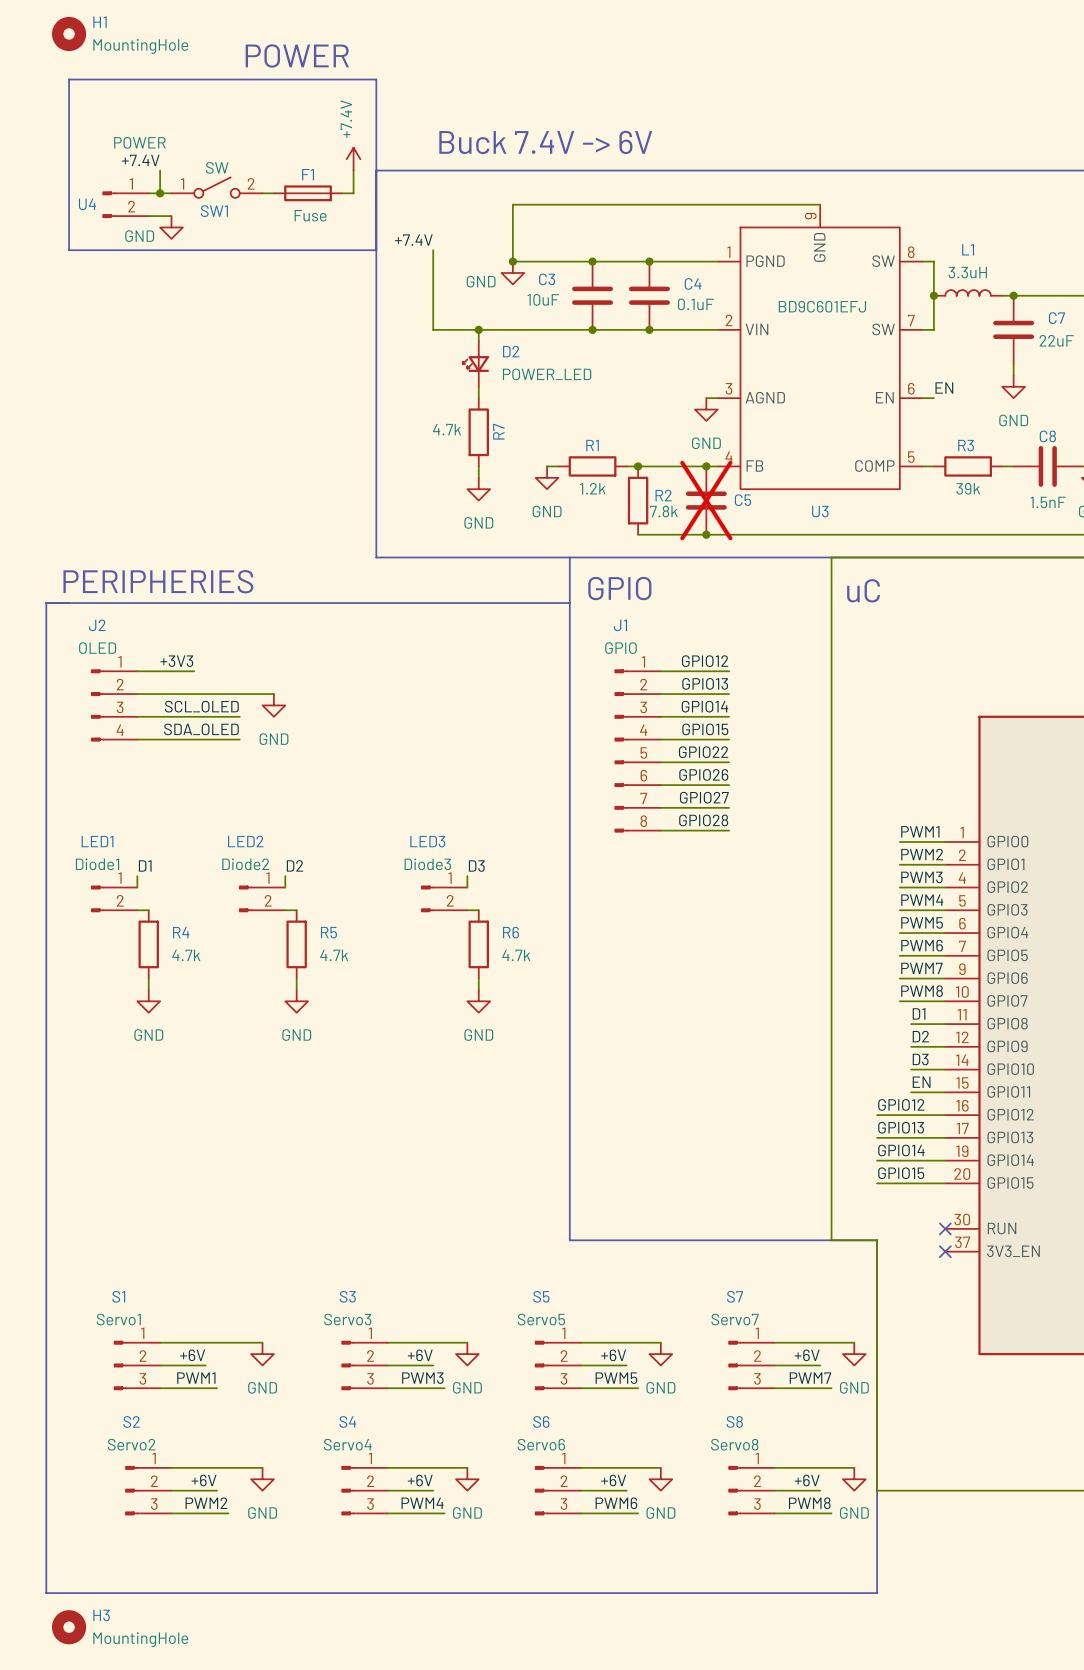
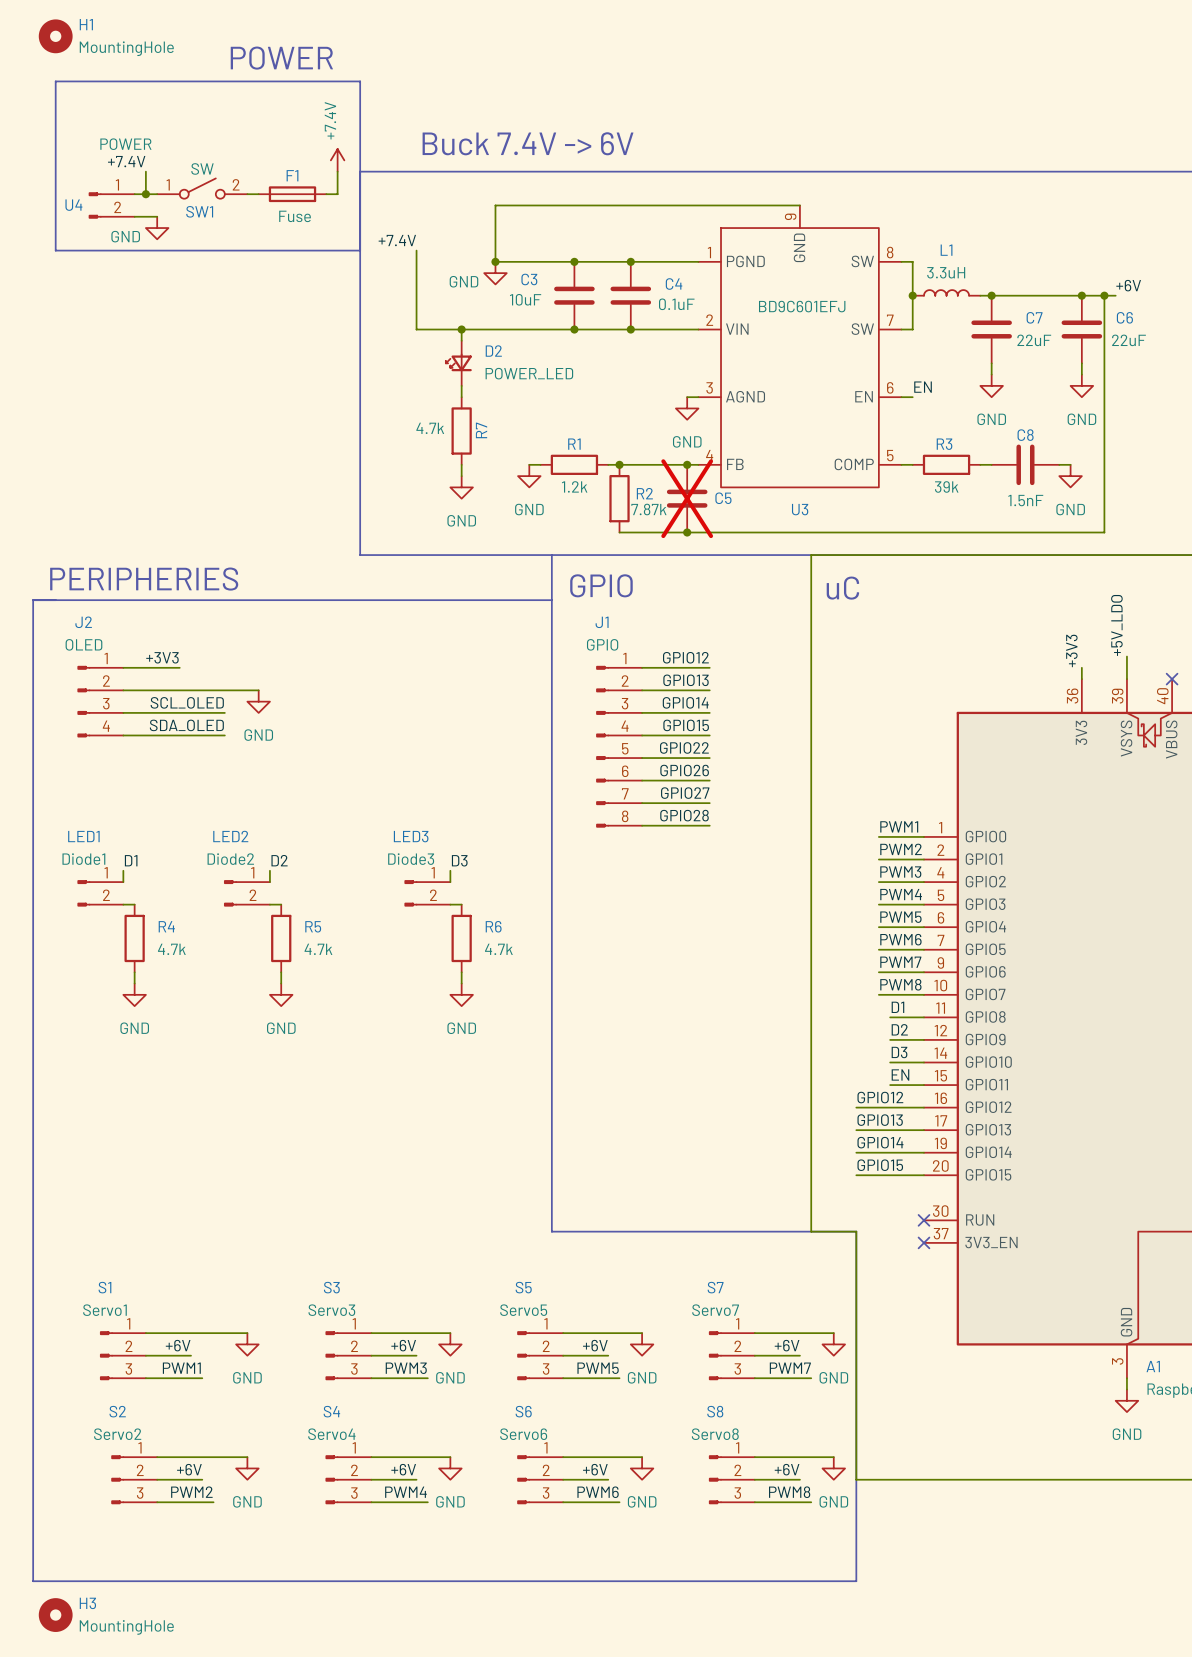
R2 value: 7.8k (663, 511) -> 7.87k (648, 509)

